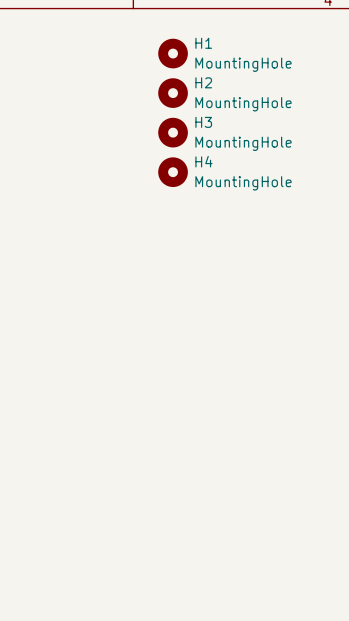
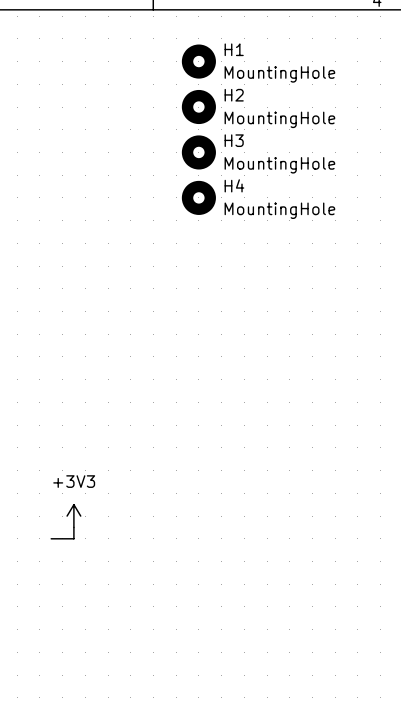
power symbol: none -> +3V3 (73, 516)
wire: none -> (73, 527) (73, 538) (51, 538)

